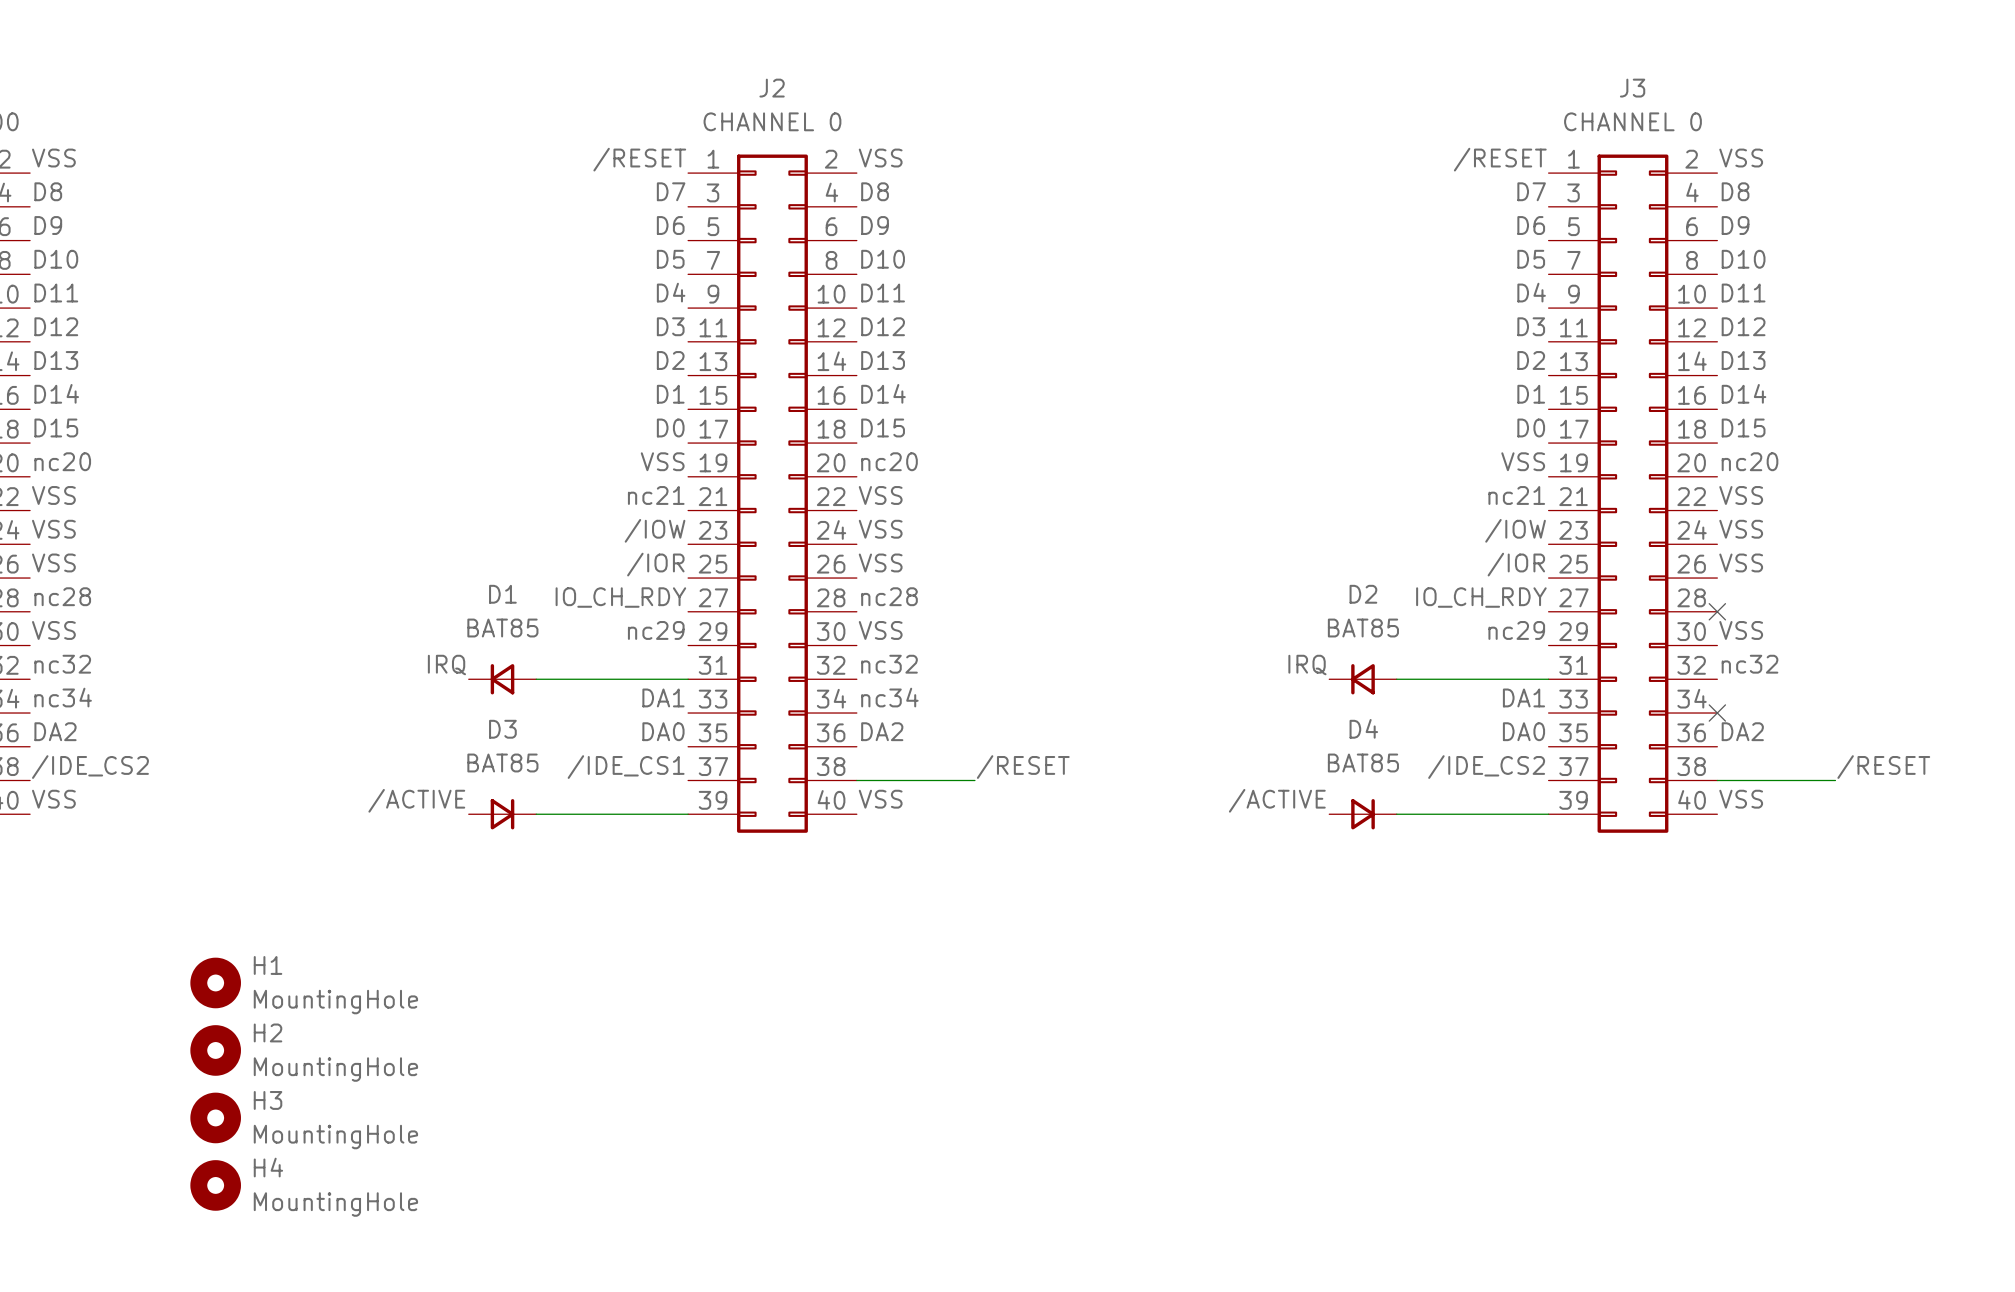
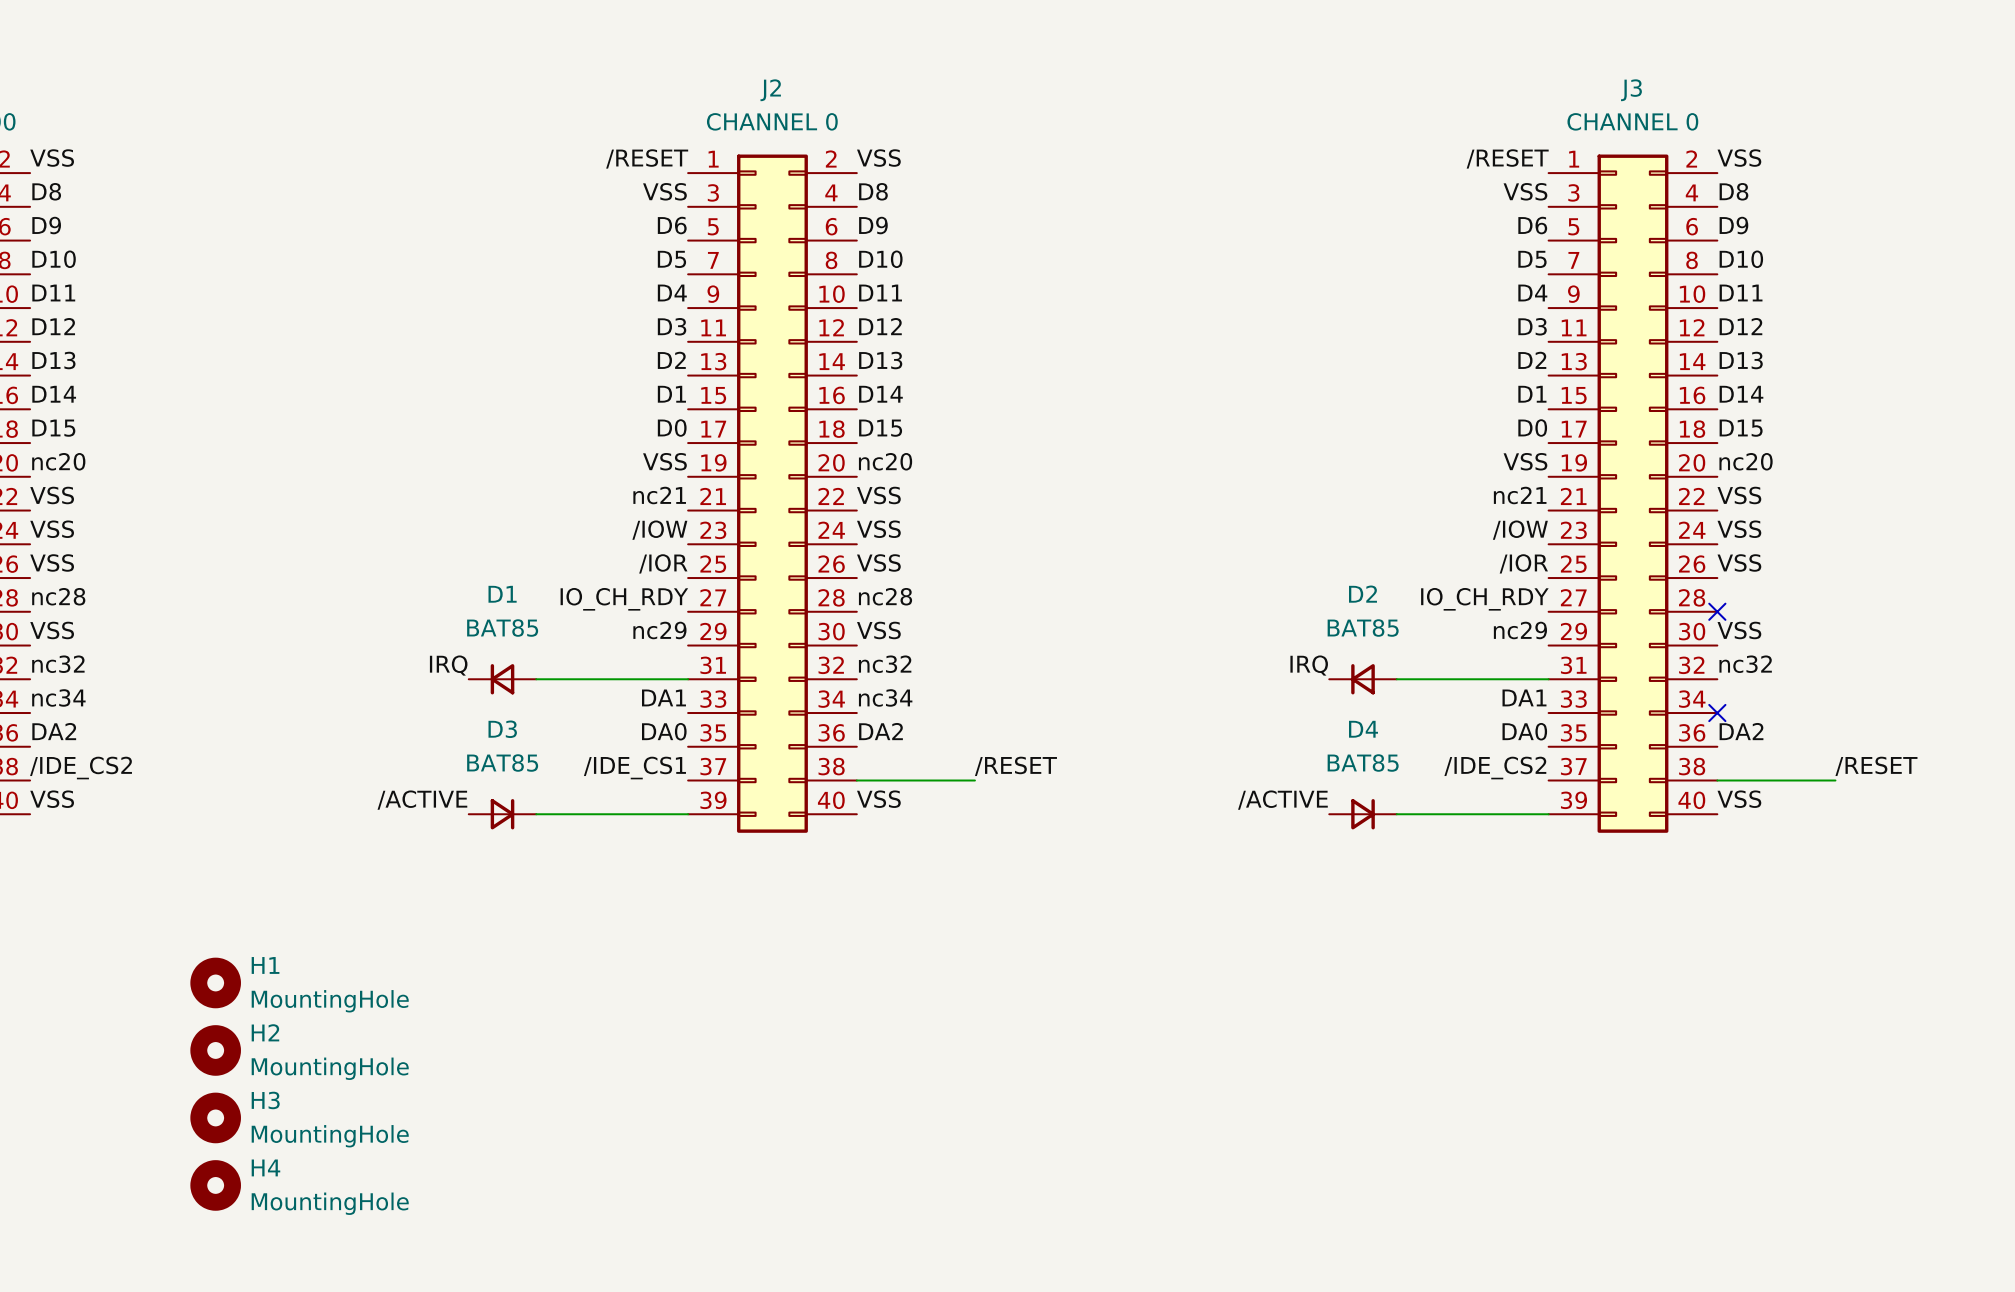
label: D7 (671, 191) -> VSS (664, 191)
label: D7 (1531, 191) -> VSS (1525, 191)

